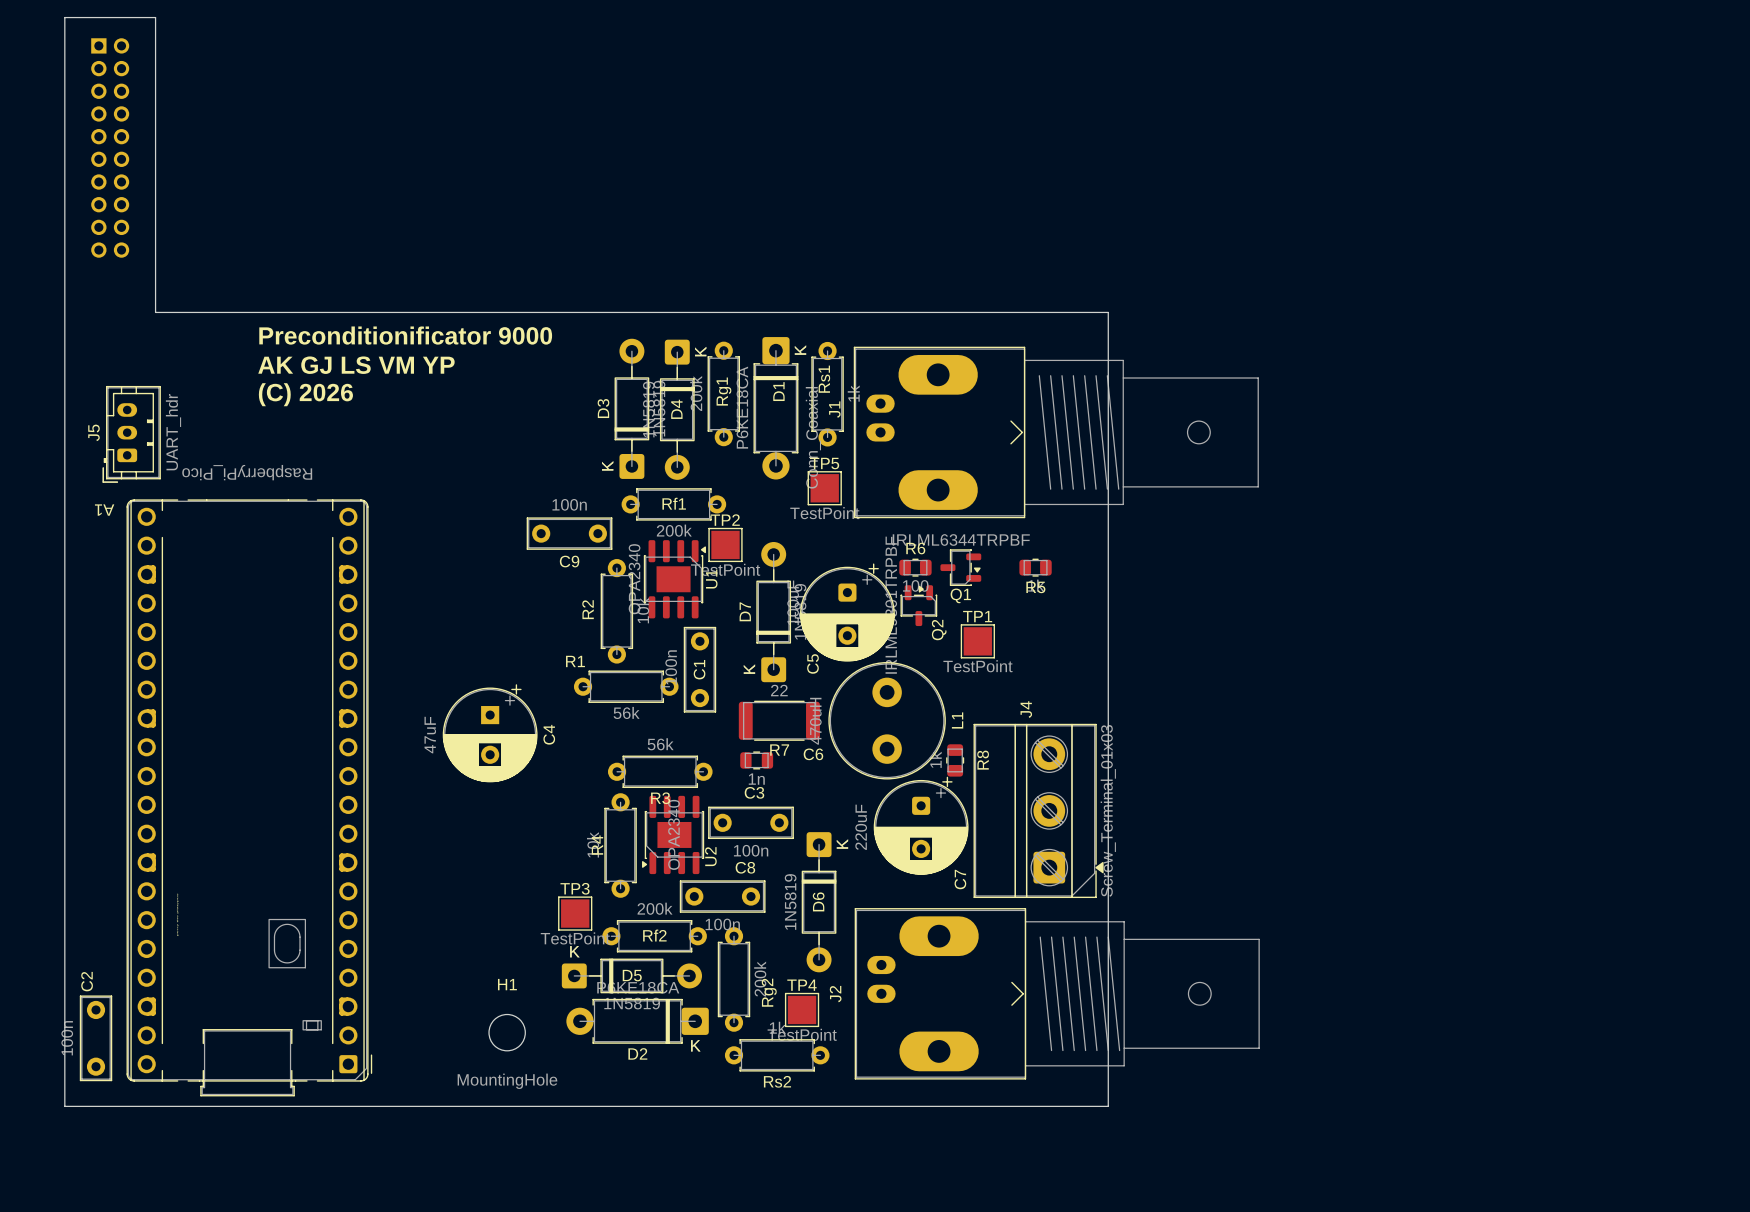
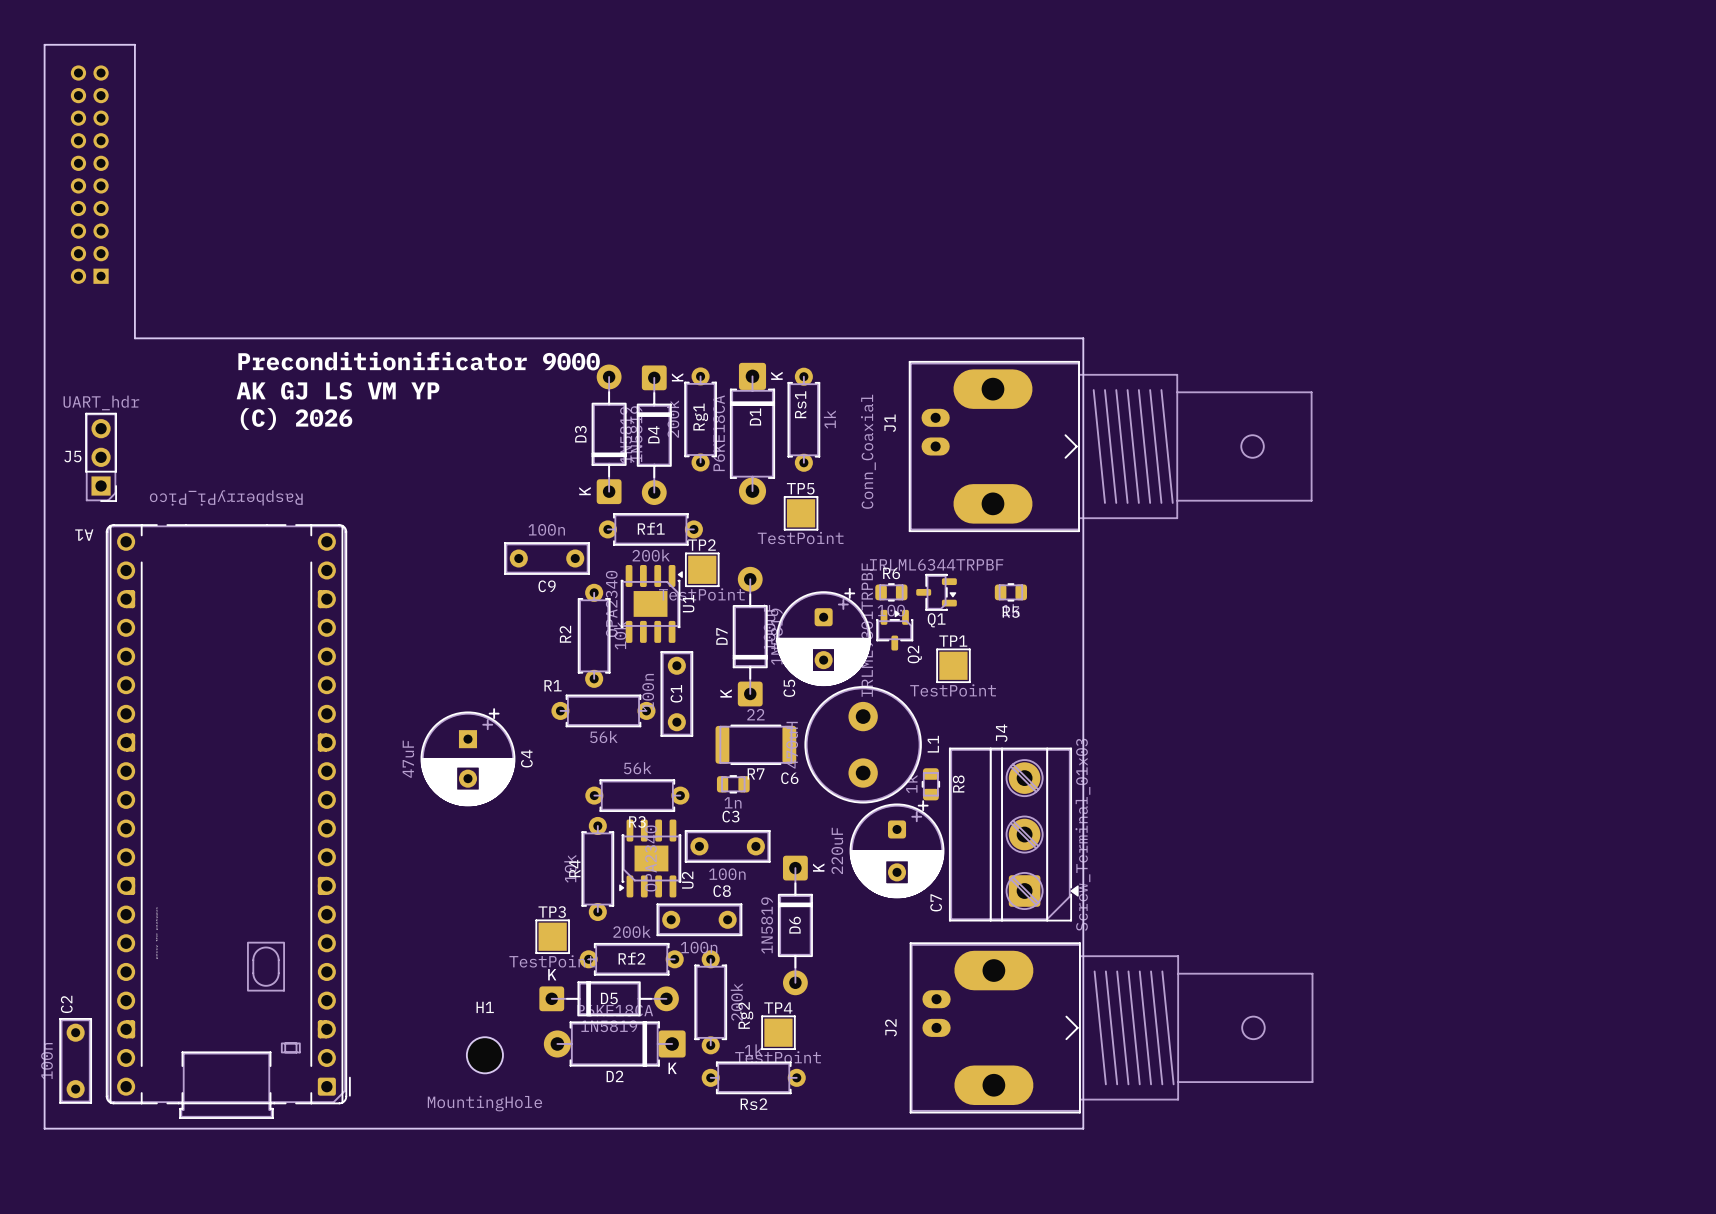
part rotation: 0° (110, 147) -> 180° (89, 174)
J5 footprint: [102, 385, 161, 483] -> [85, 412, 117, 502]
J5 value position: UART_hdr (173, 432) -> UART_hdr (101, 402)
J1 position: (1056, 432) -> (1110, 446)
J2 position: (1057, 993) -> (1111, 1027)

